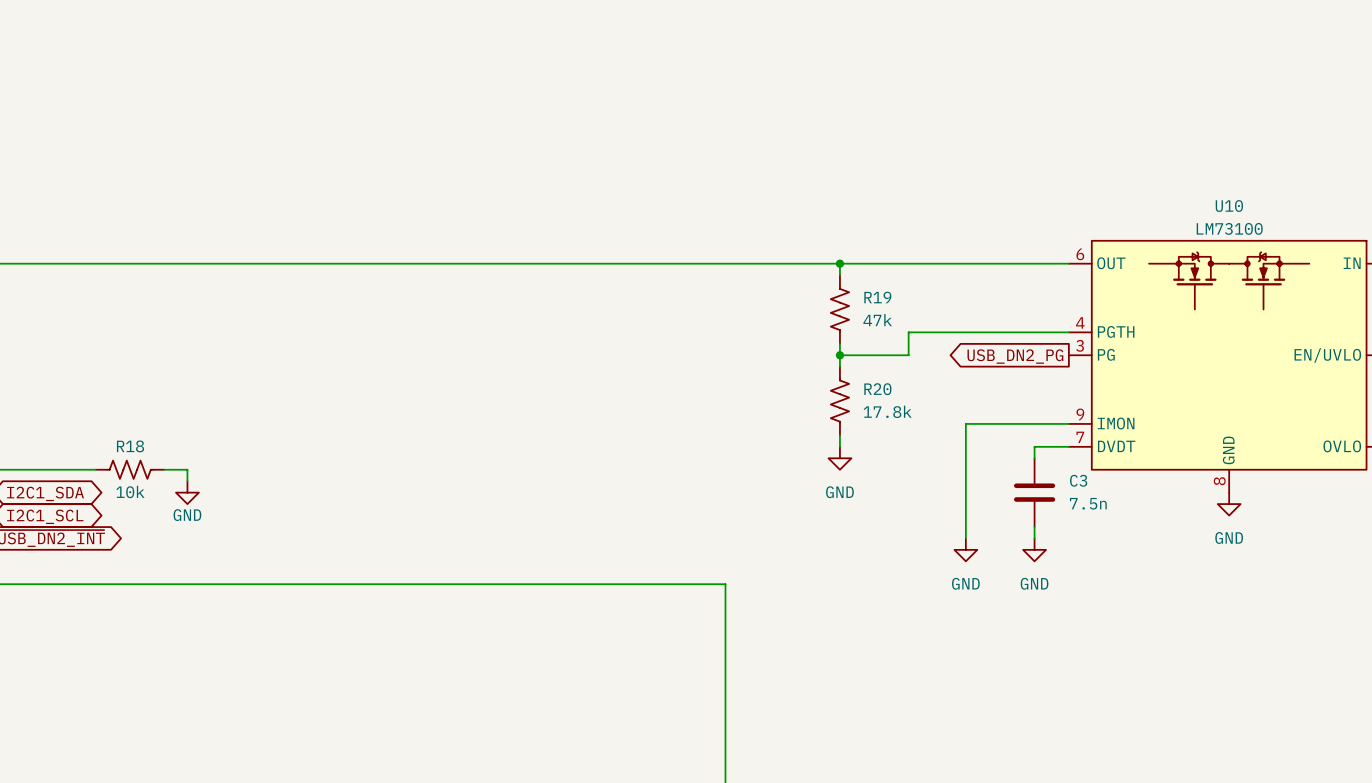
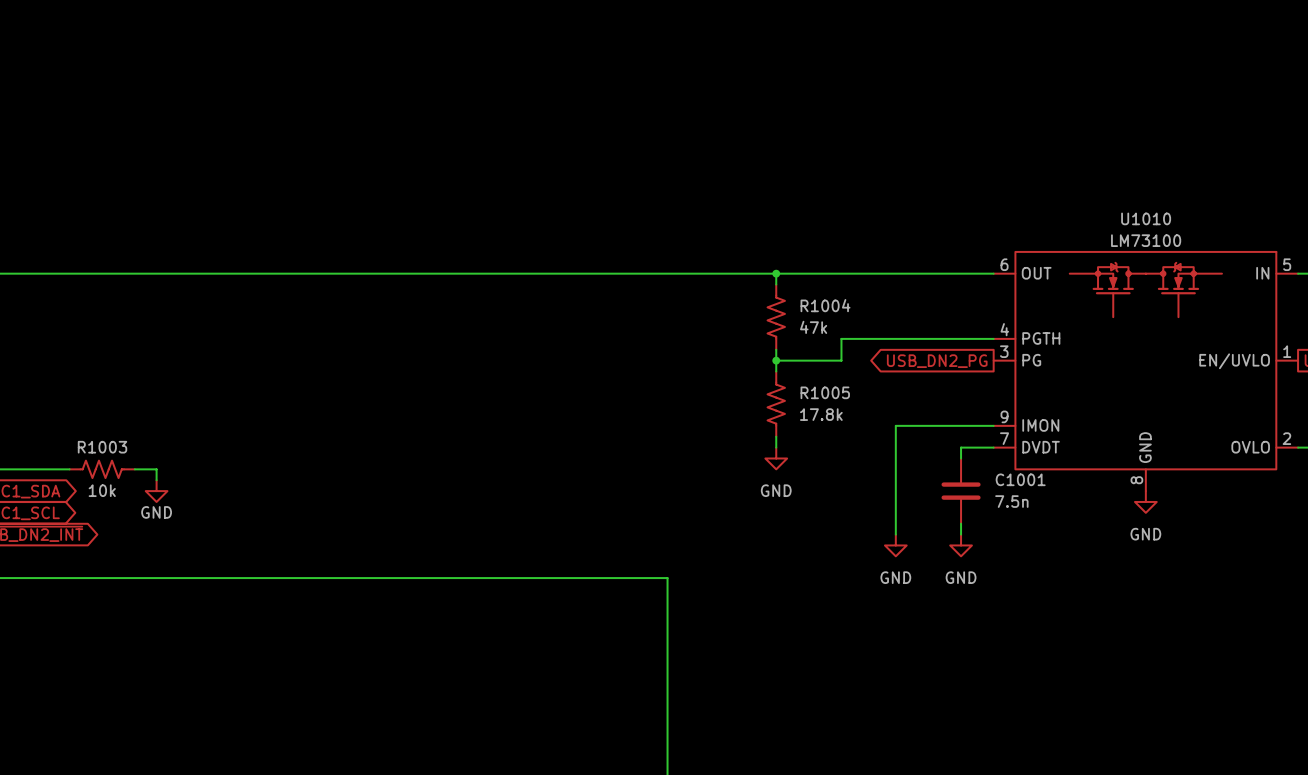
U10 name: U10 (1229, 206) -> U1010 (1146, 218)
R19 name: R19 (877, 297) -> R1004 (825, 305)
R20 name: R20 (877, 389) -> R1005 (825, 392)
R18 name: R18 (130, 446) -> R1003 (102, 447)
C3 name: C3 (1078, 480) -> C1001 (1020, 479)

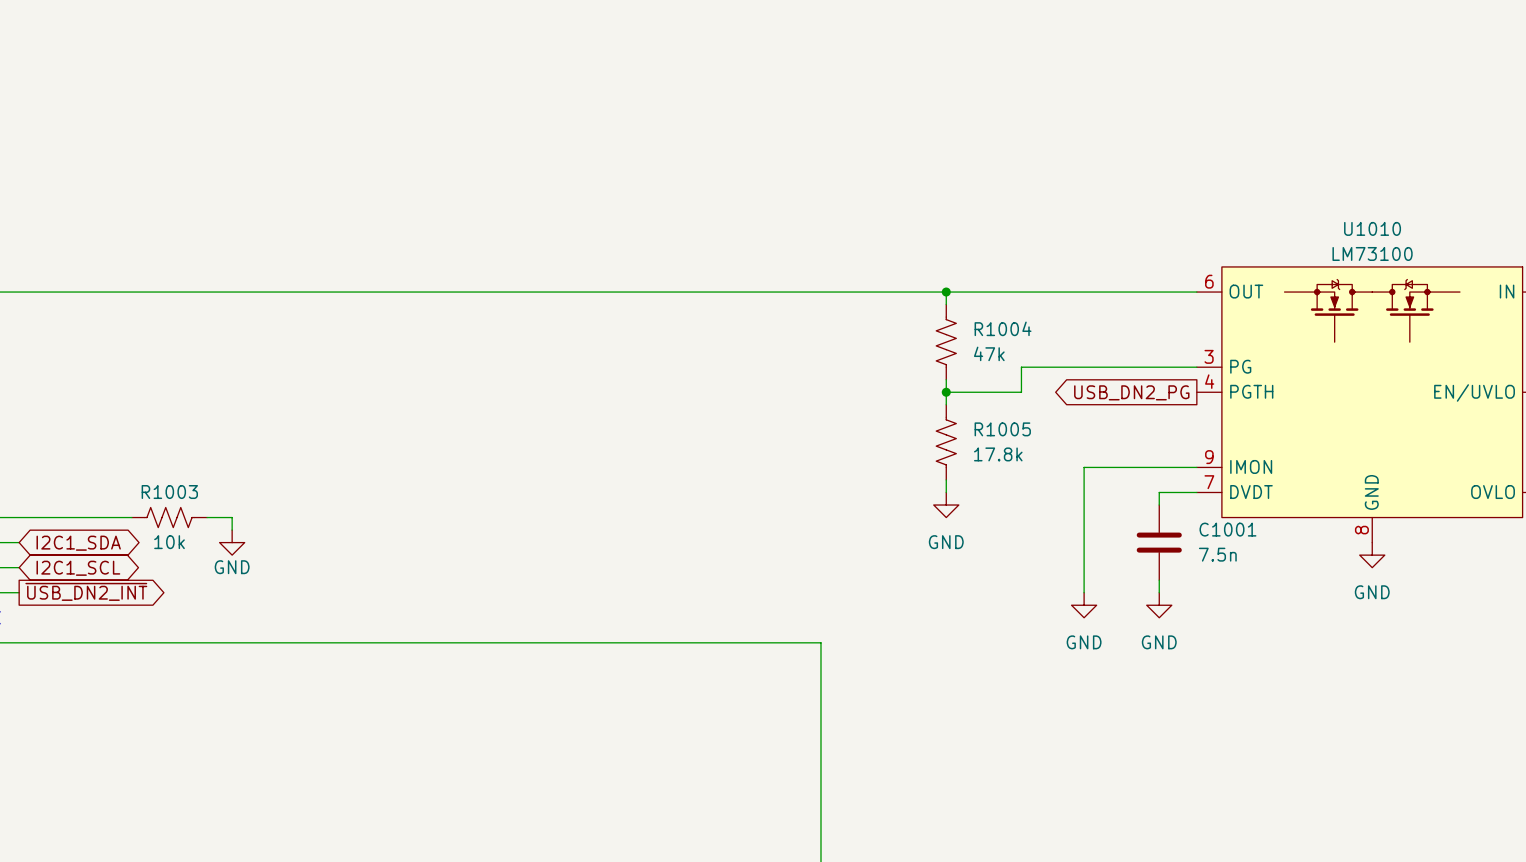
U1010 pin number: 4 (1004, 329) -> 3 (1209, 356)
U1010 pin name: PGTH (1041, 338) -> PG (1240, 366)
U1010 pin number: 3 (1004, 351) -> 4 (1209, 381)
U1010 pin name: PG (1031, 360) -> PGTH (1251, 391)

